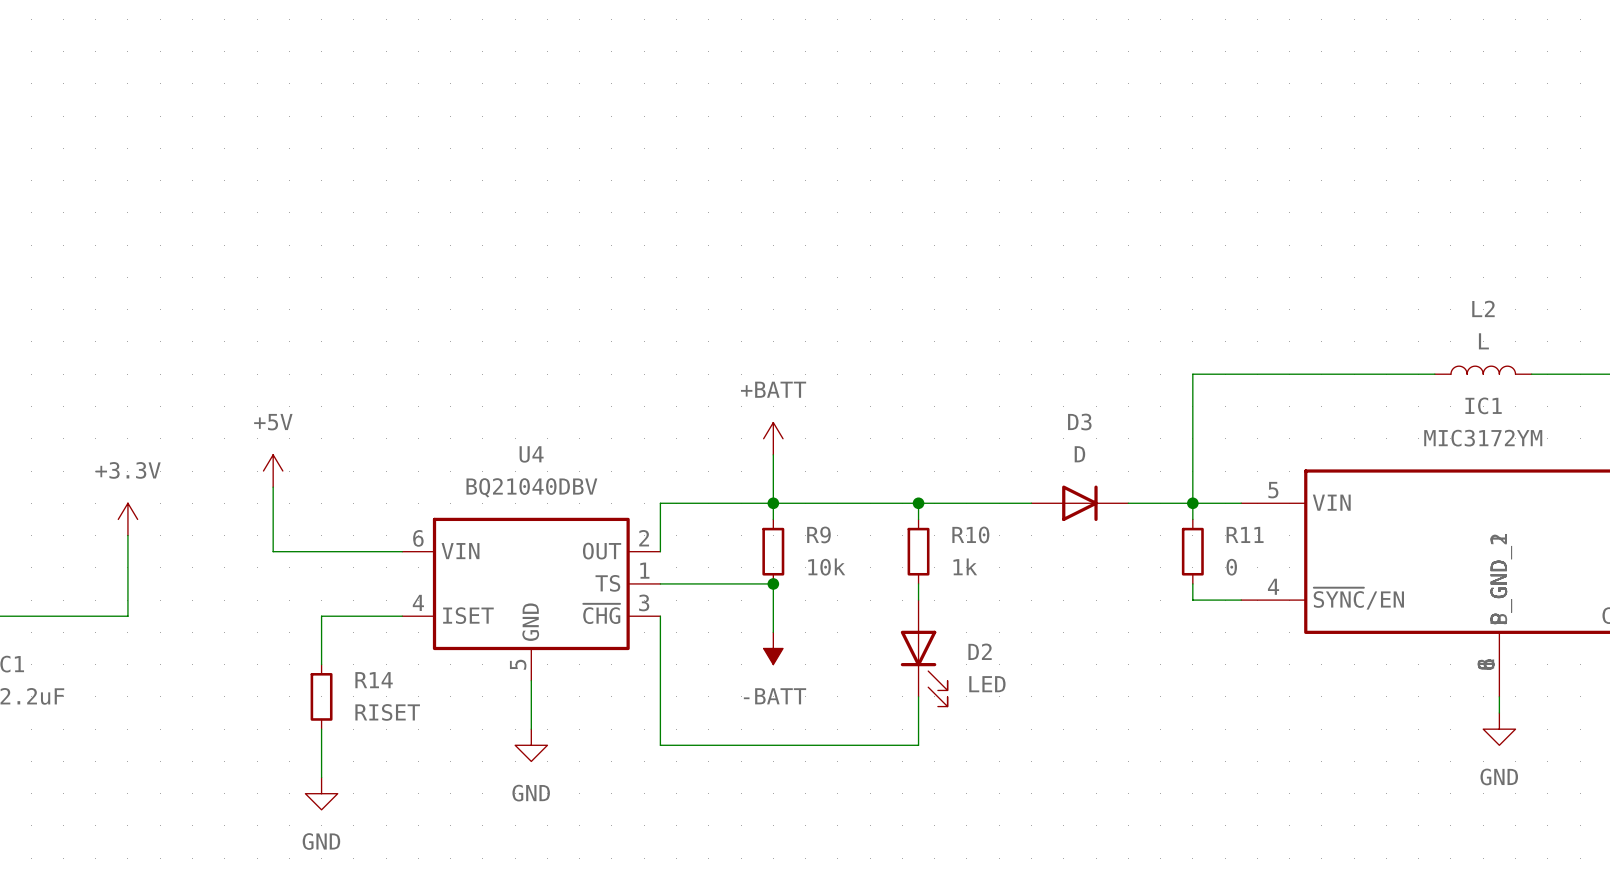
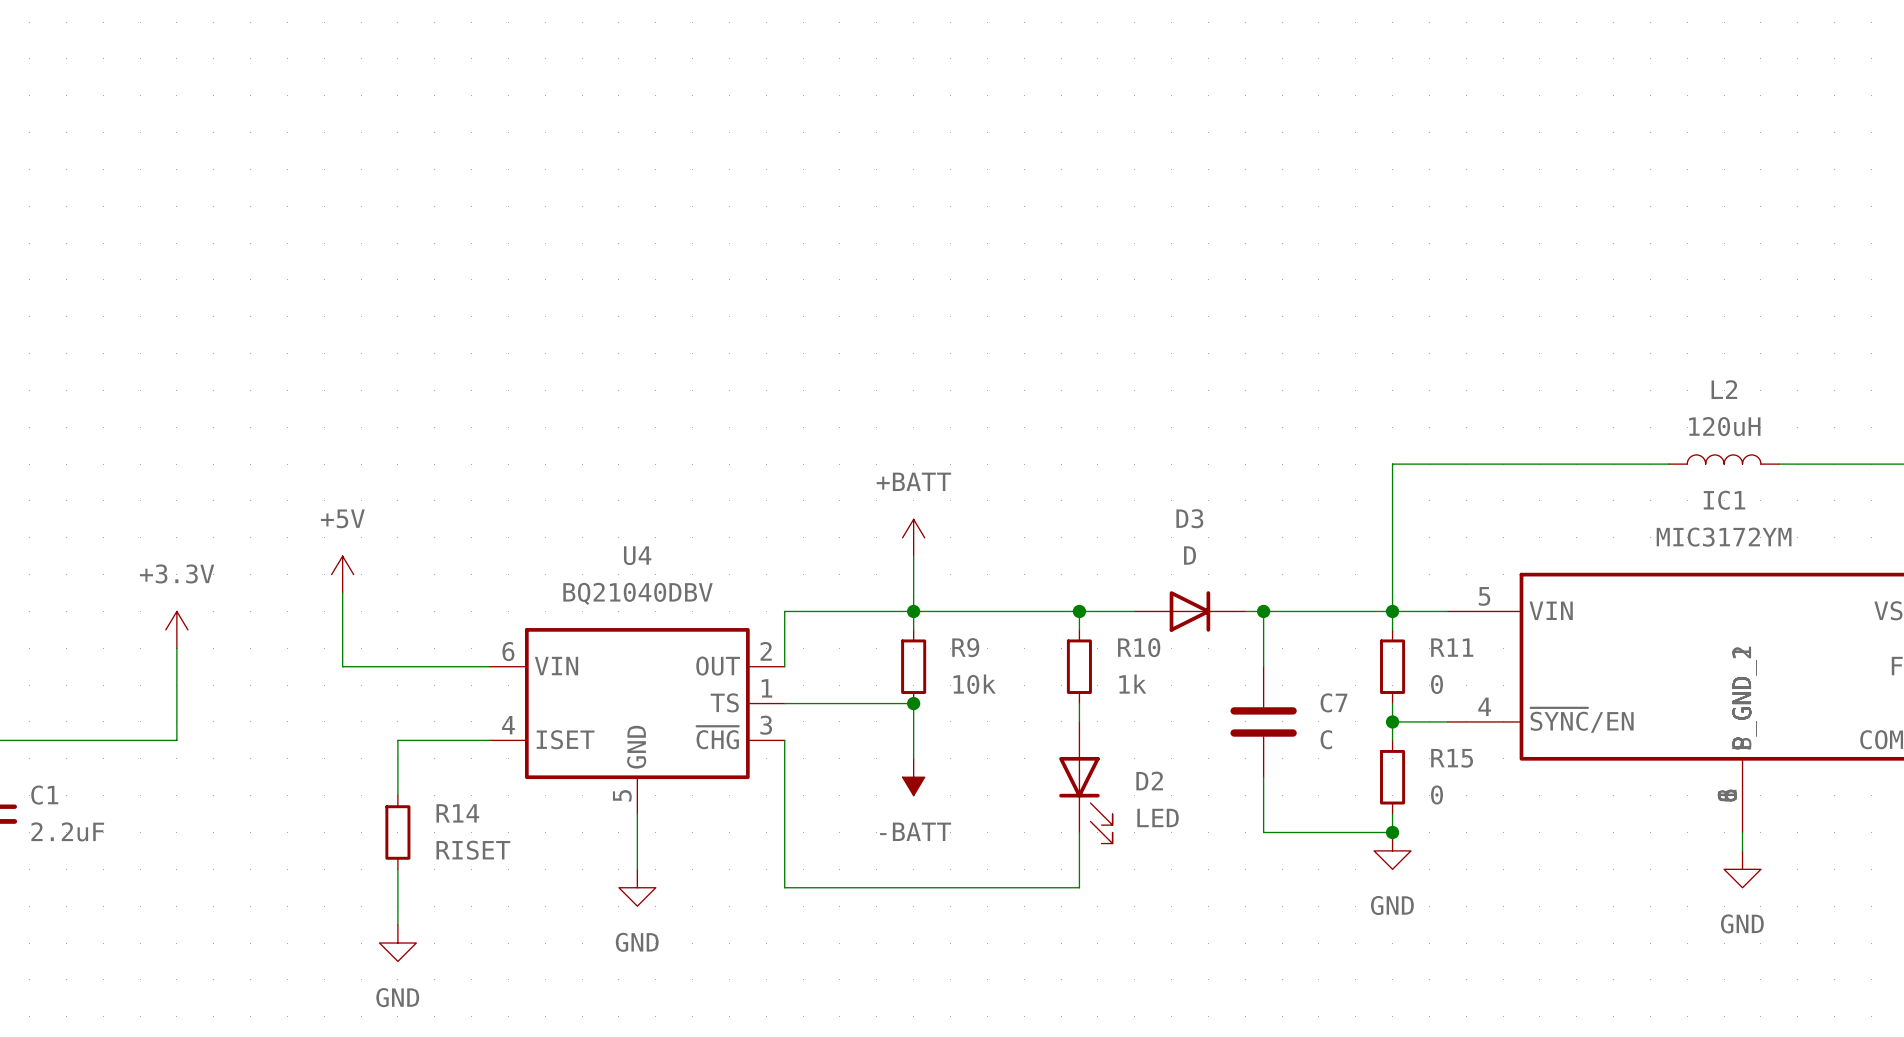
L2 value: L (1483, 341) -> 120uH (1724, 426)
wire: none -> (1263, 611) (1263, 666)
D3 position: (1079, 503) -> (1189, 611)
junction: none -> (1263, 611)
C7: none -> C (1263, 721)
wire: none -> (1392, 721) (1392, 740)
junction: none -> (1392, 721)
wire: none -> (1263, 777) (1263, 832) (1392, 832) (1392, 814)
R15: none -> 0 (1392, 777)
junction: none -> (1392, 832)
power symbol: none -> GND (1392, 850)

